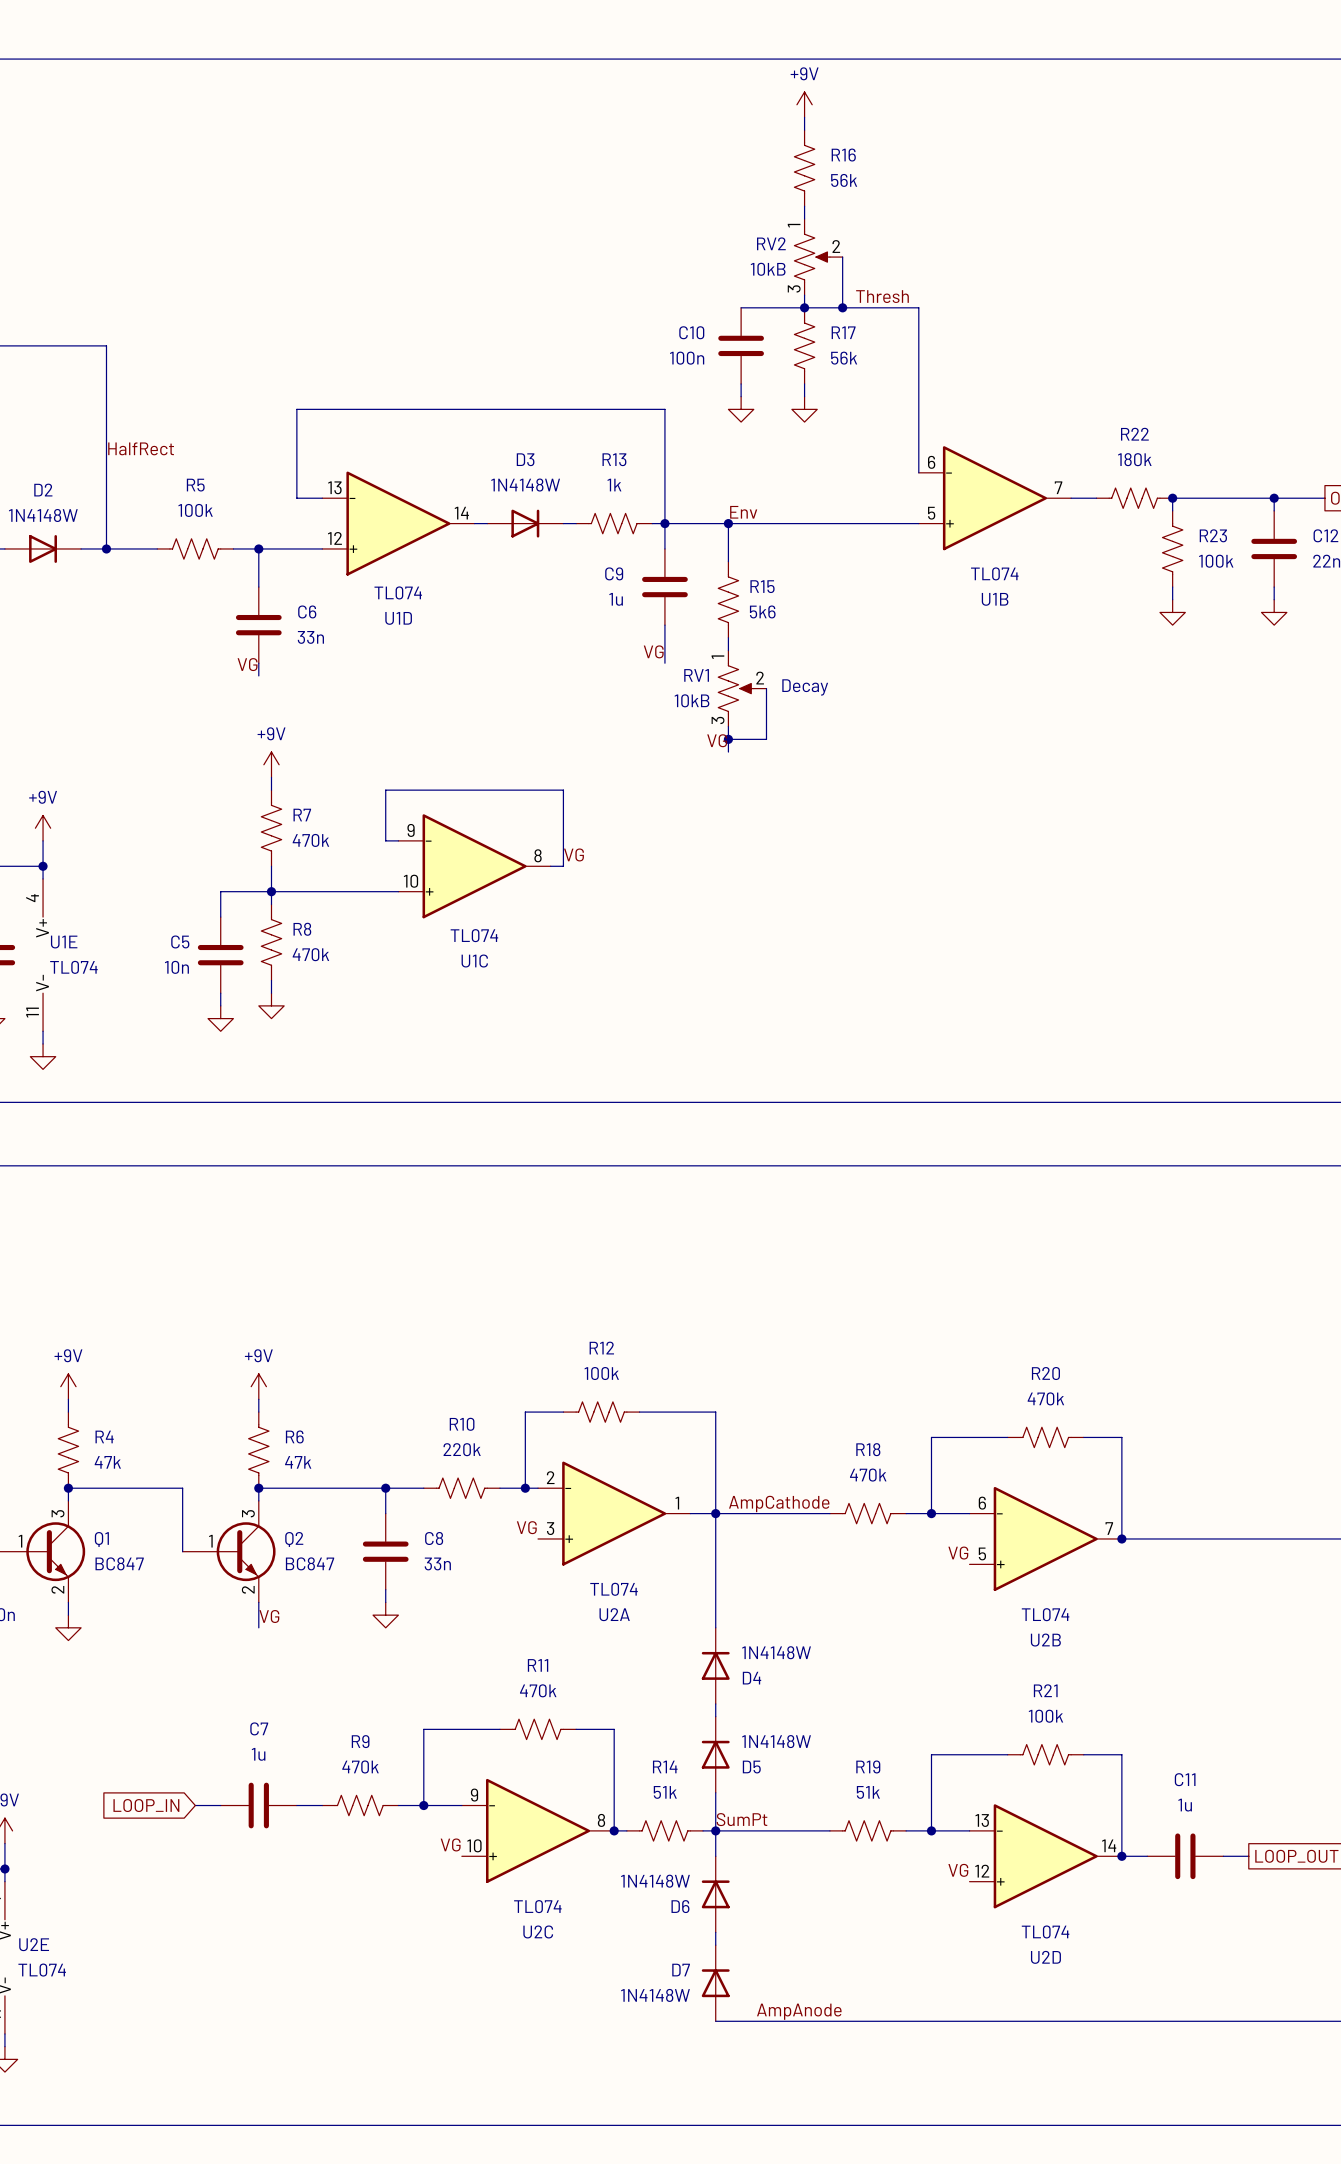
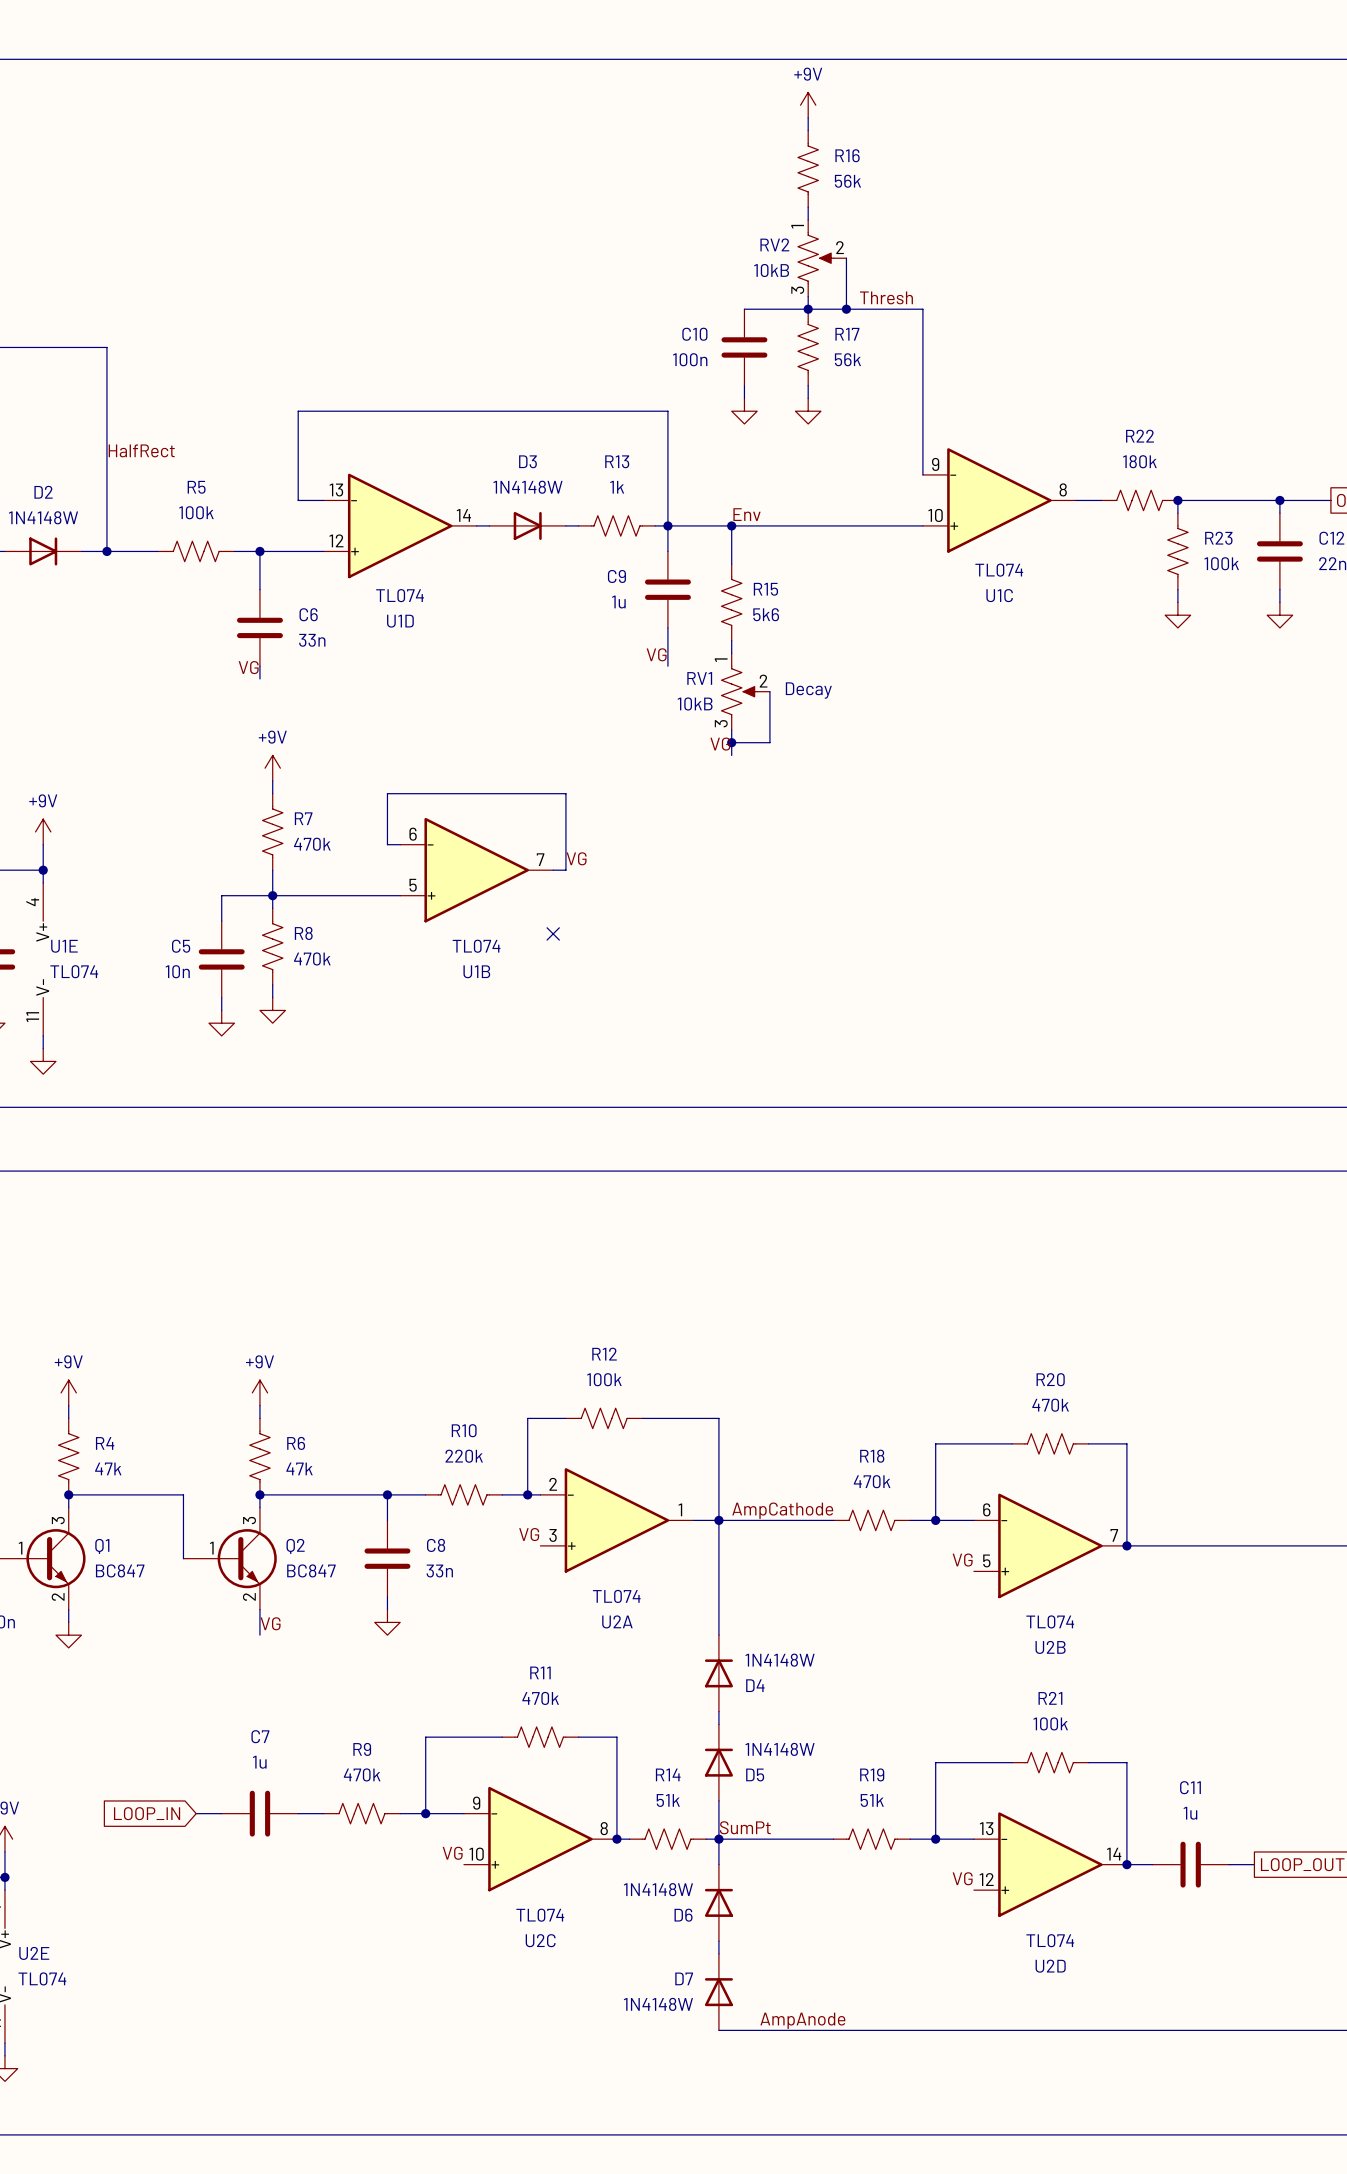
U1B position: (994, 498) -> (476, 870)
U1C position: (474, 866) -> (999, 500)
no-connect mark: none -> (553, 933)

